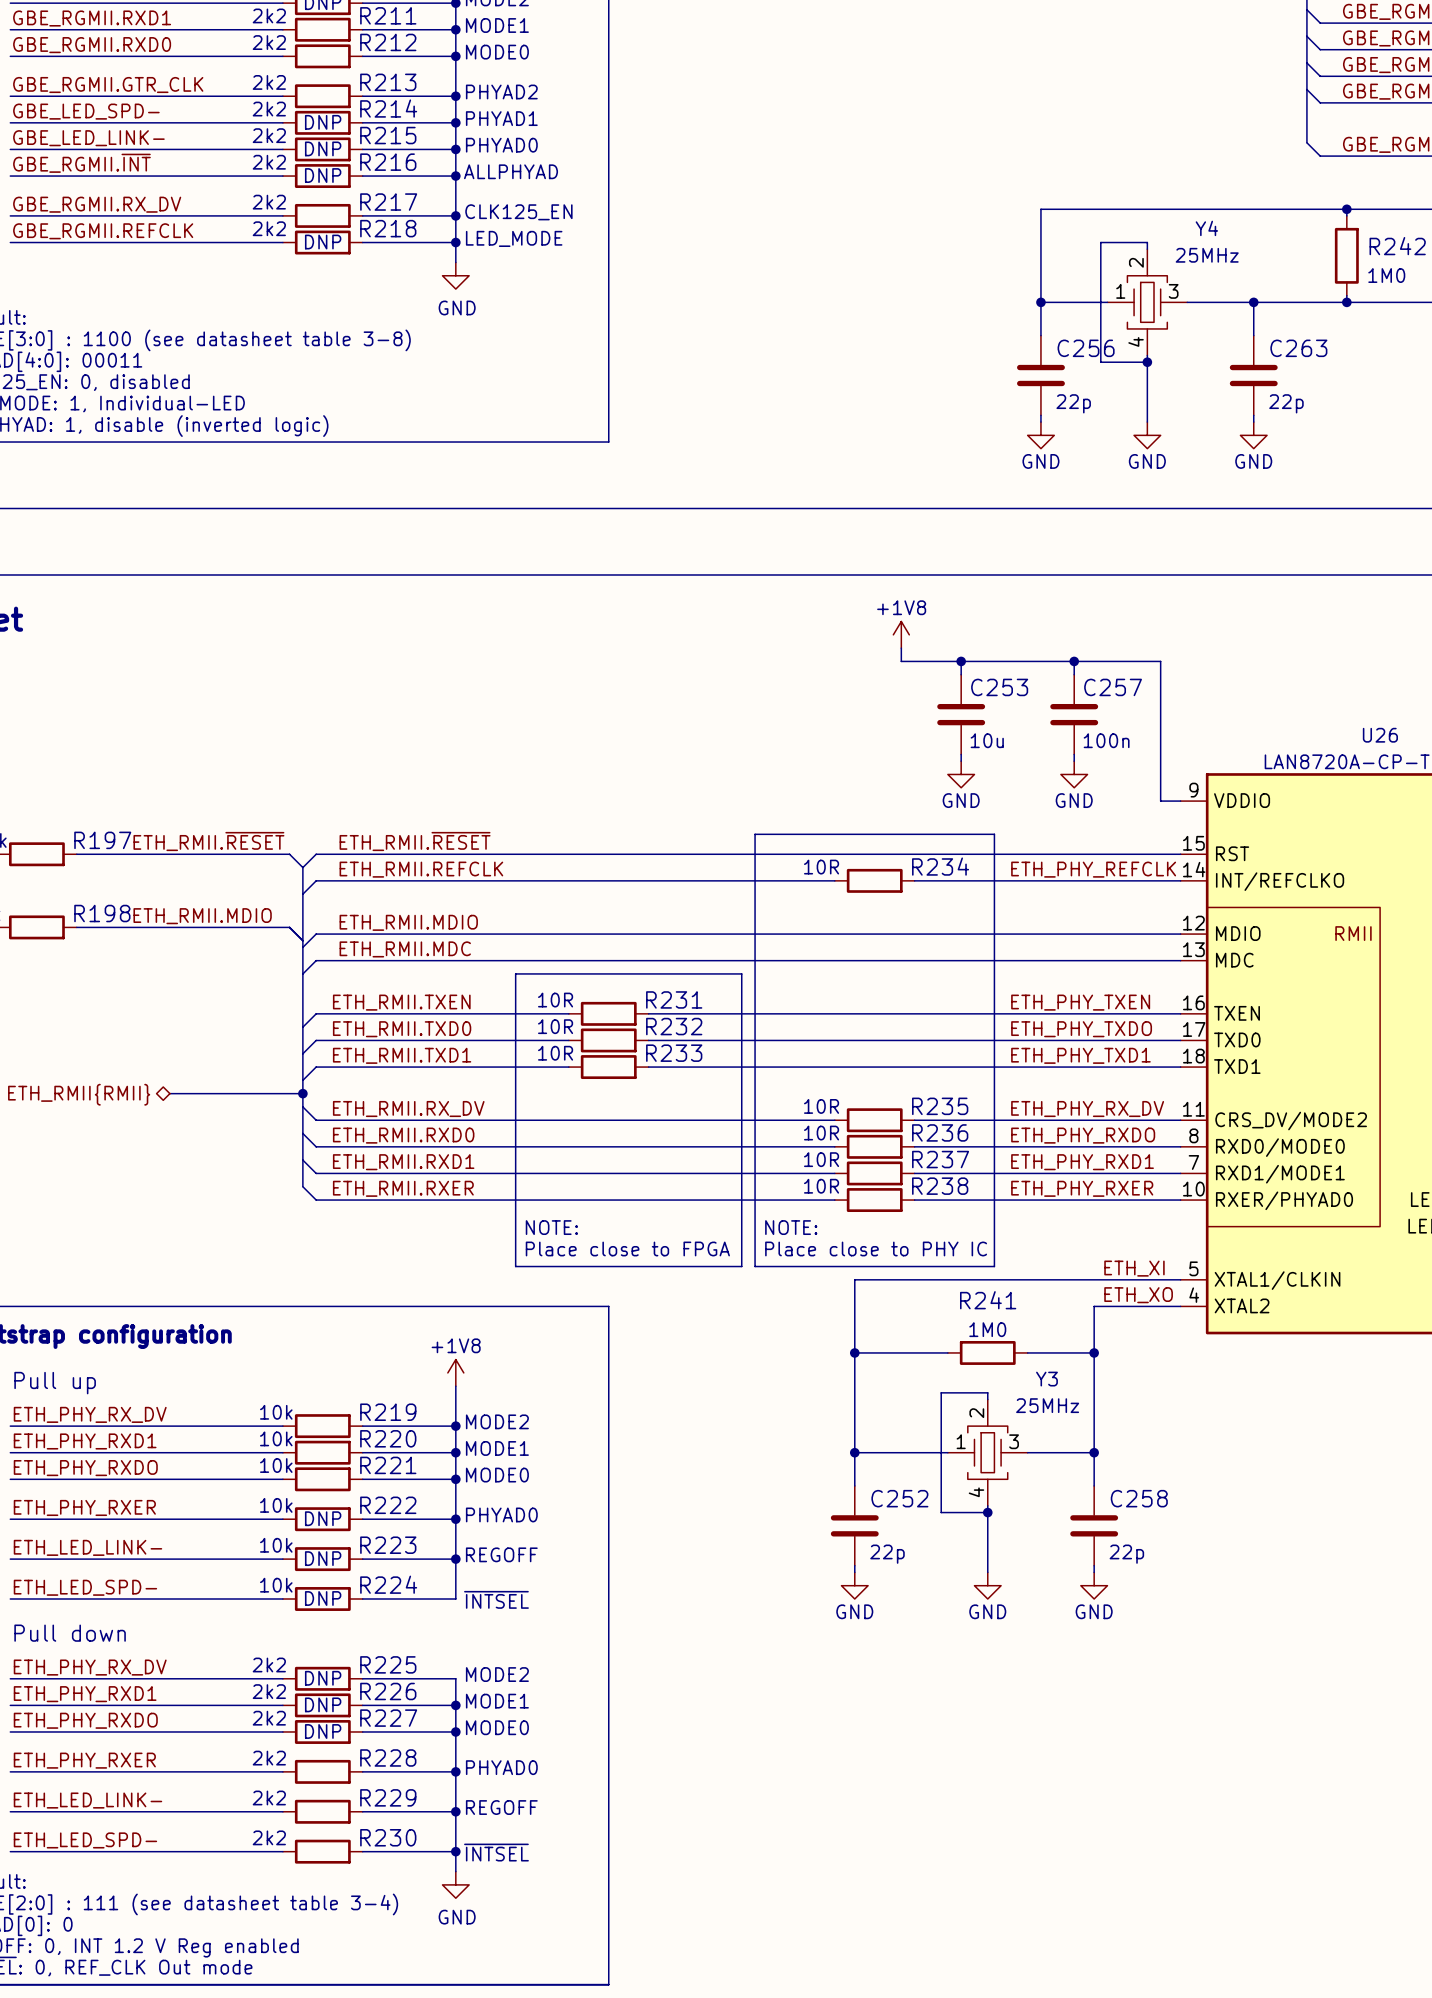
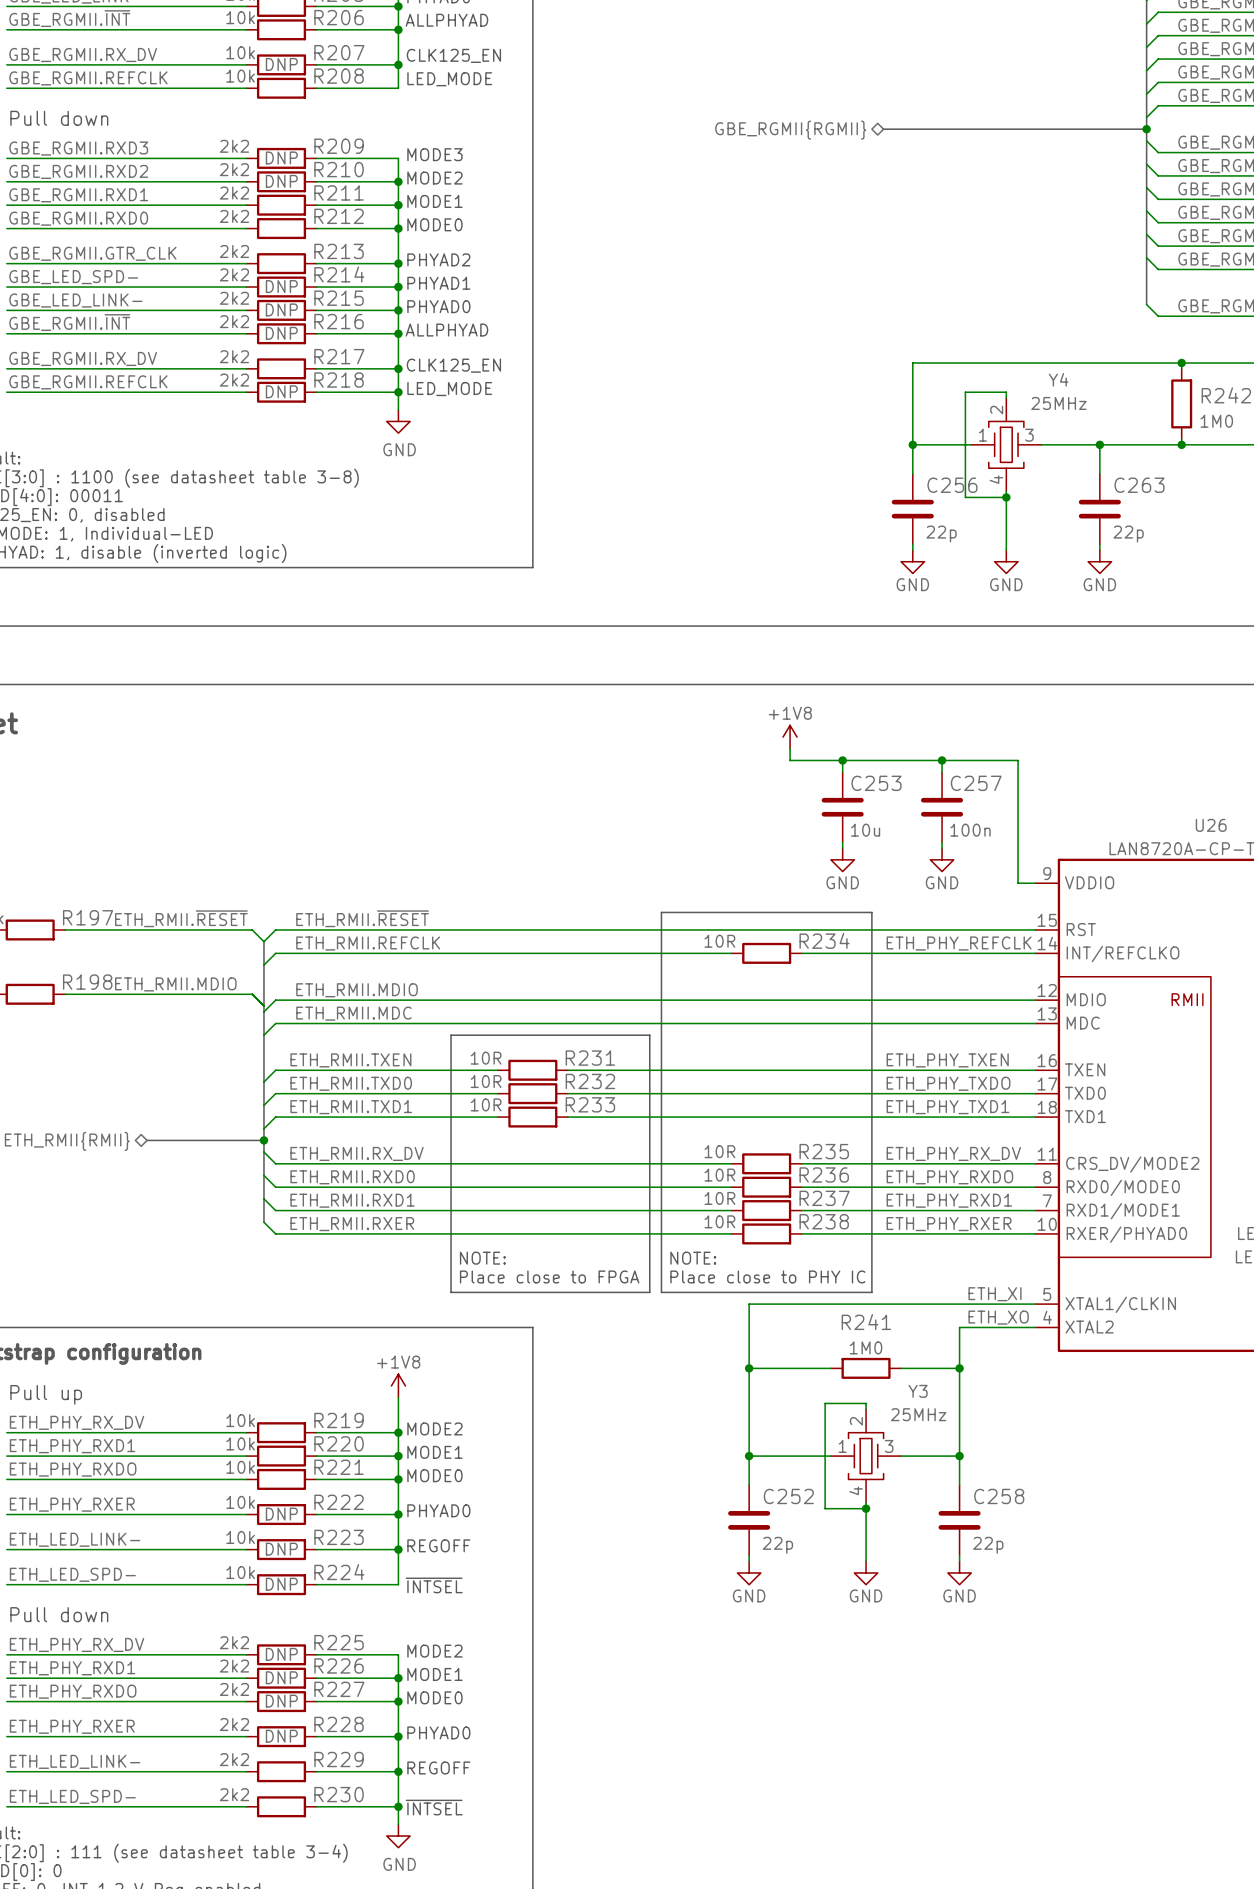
R228 text: none -> DNP (281, 1736)

